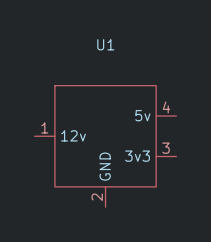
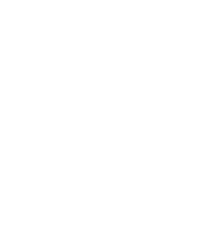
U1: (105, 146) -> none

